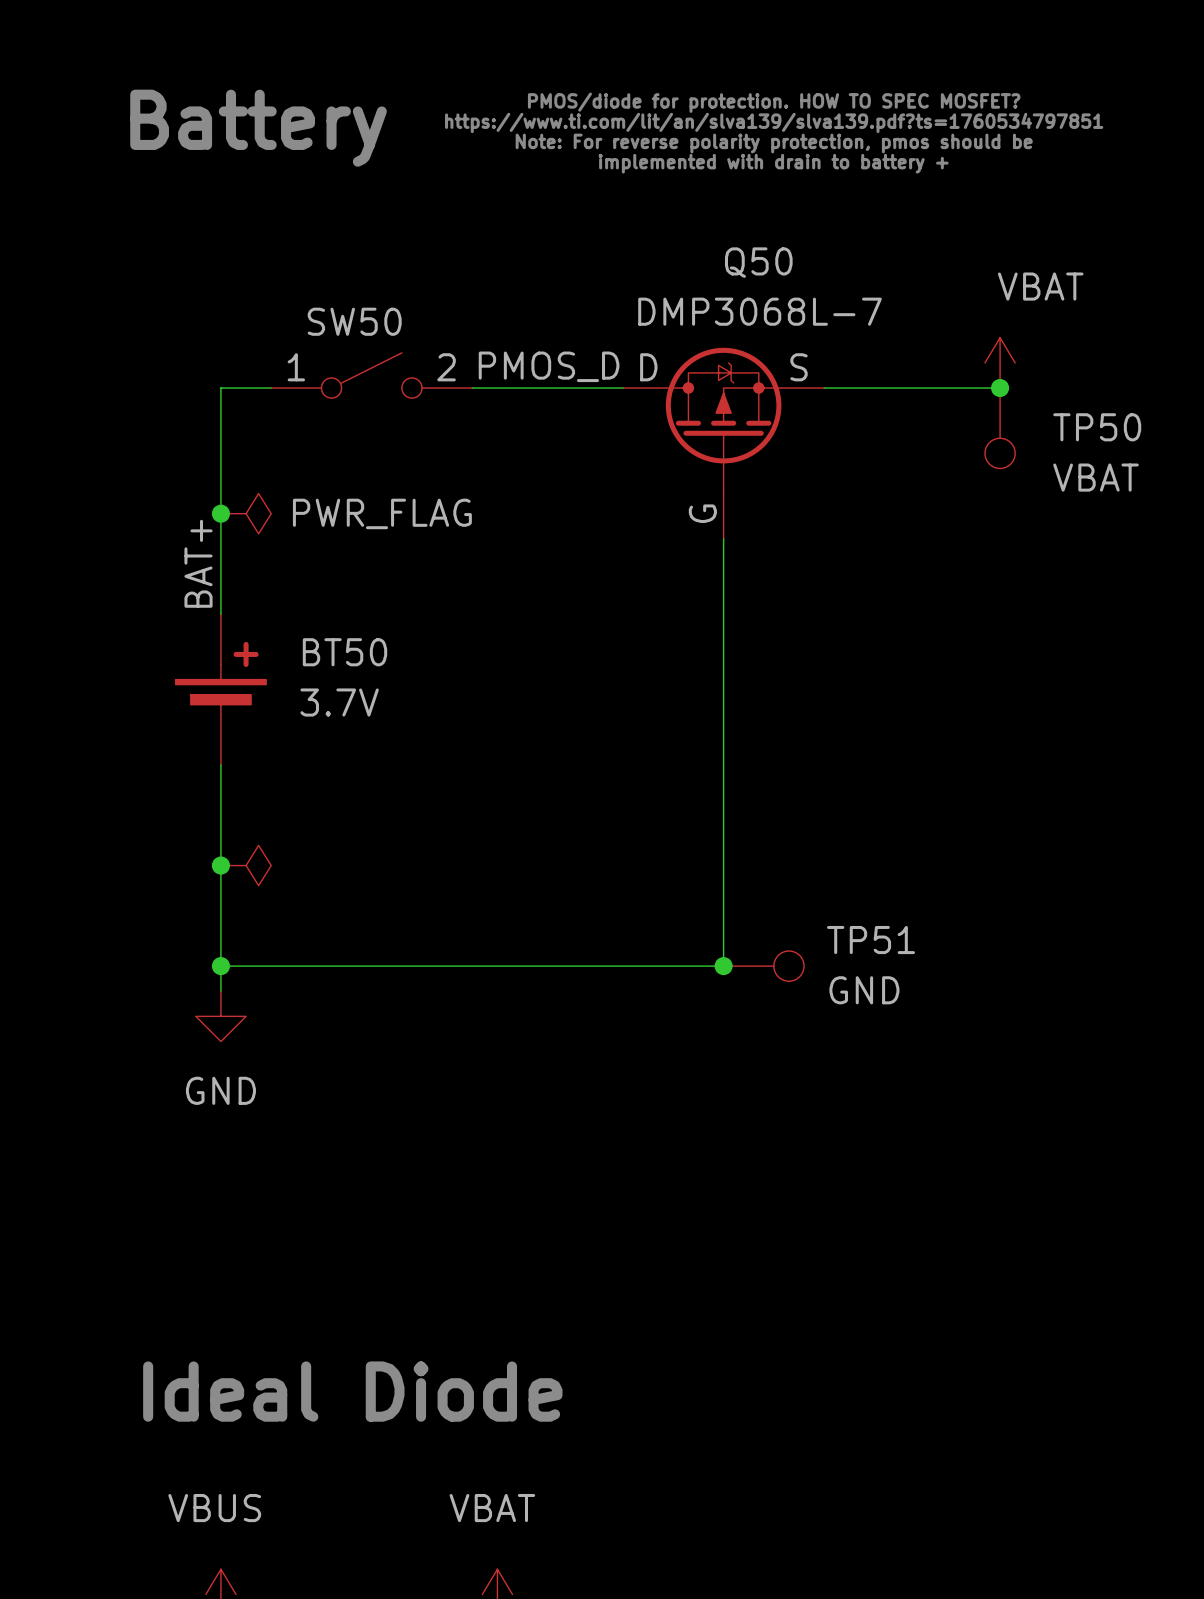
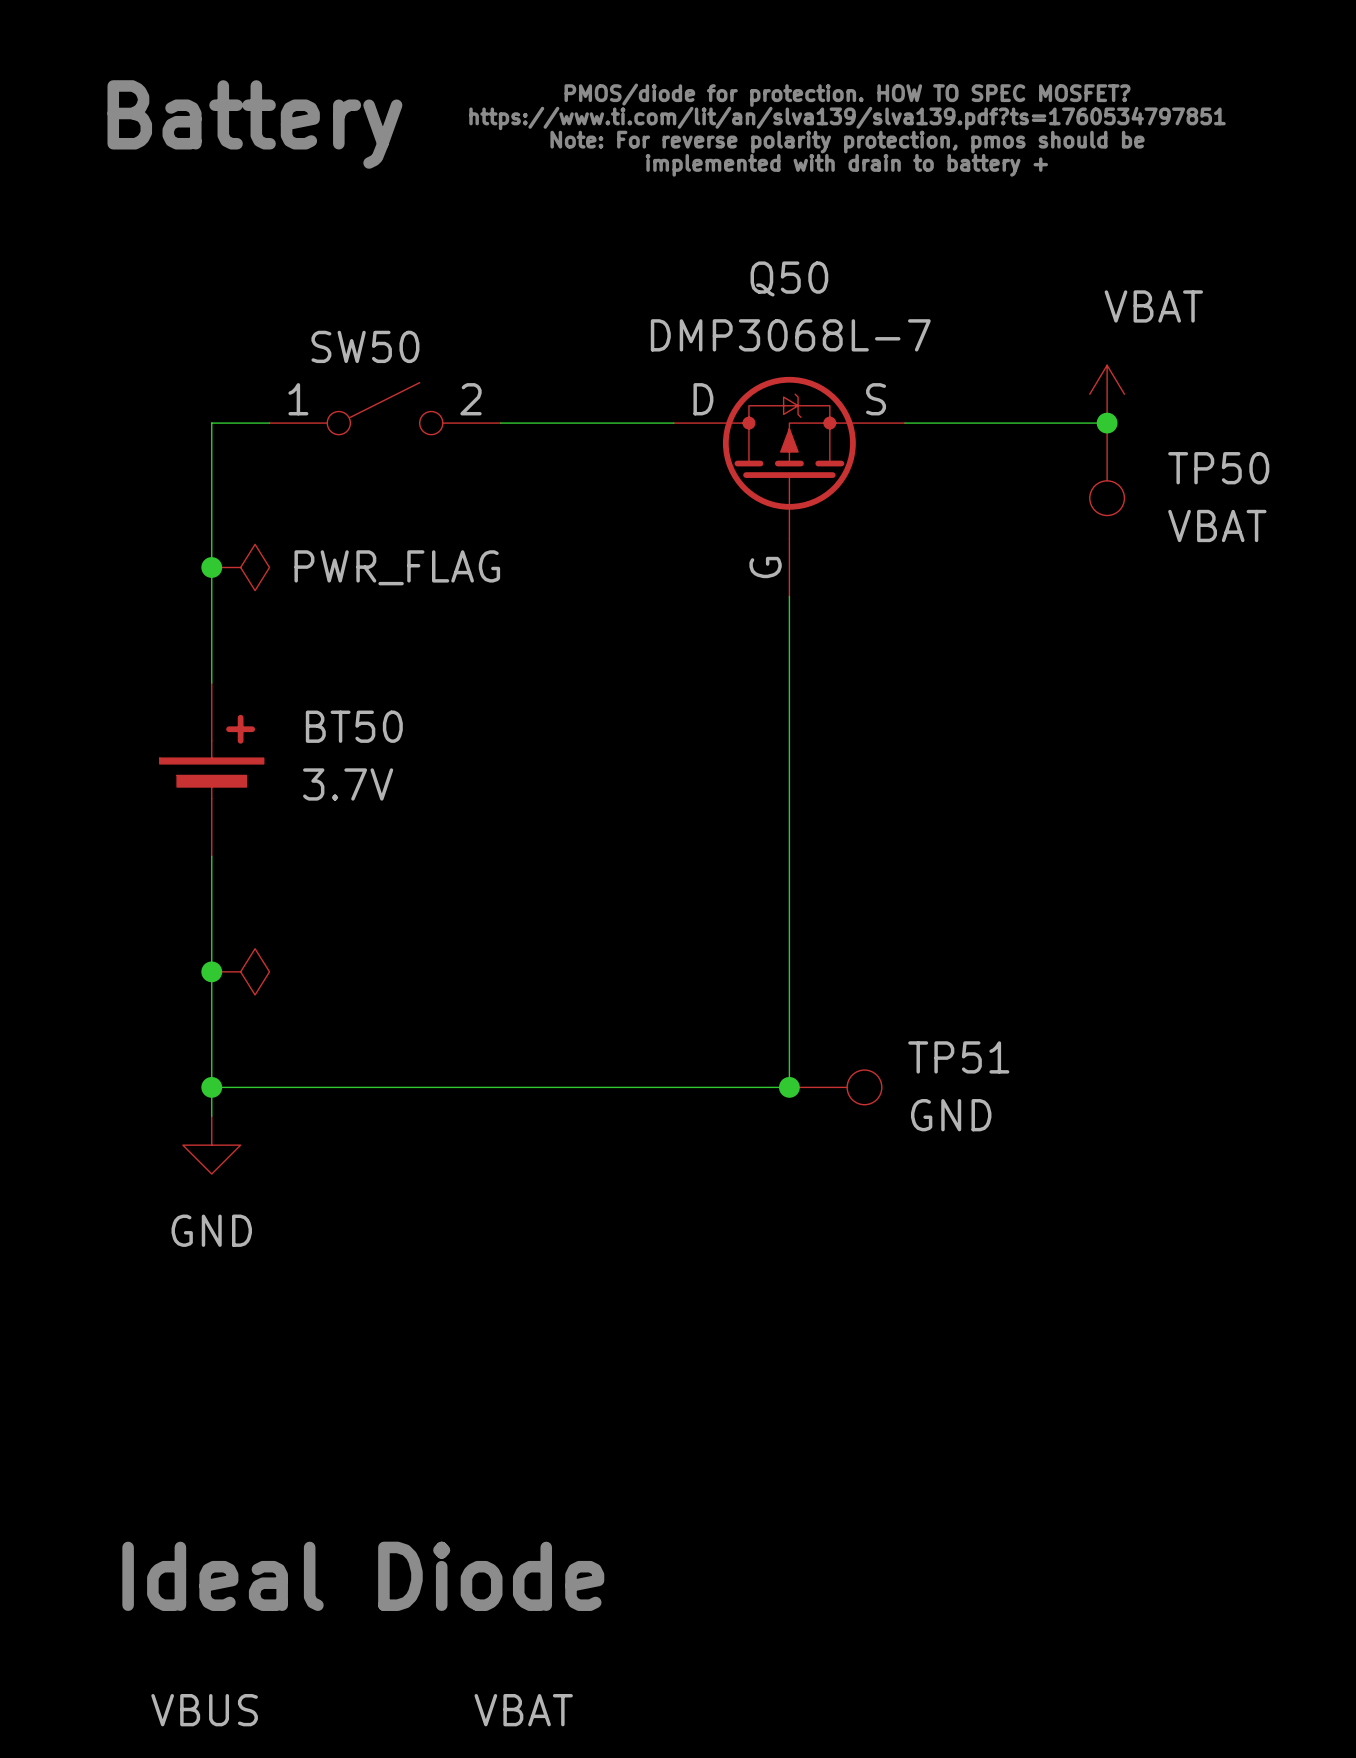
Q50 name position: Q50 (758, 262) -> Q50 (789, 278)
Q50 value position: DMP3068L-7 (759, 311) -> DMP3068L-7 (790, 335)
label: PMOS_D (549, 366) -> none
label: BAT+ (198, 563) -> none

